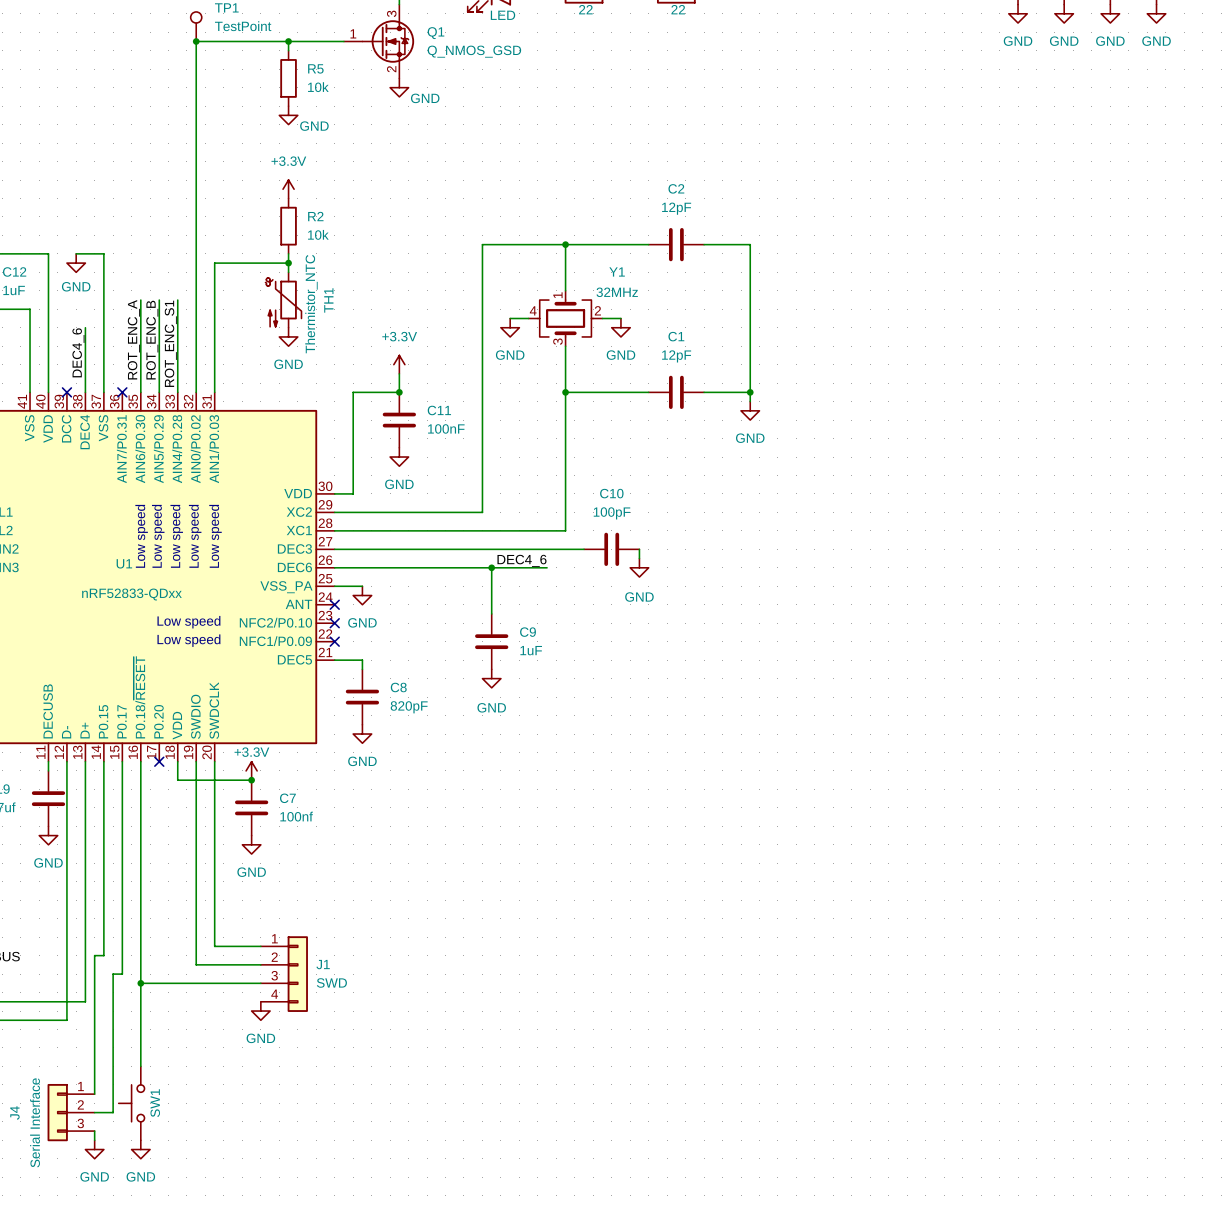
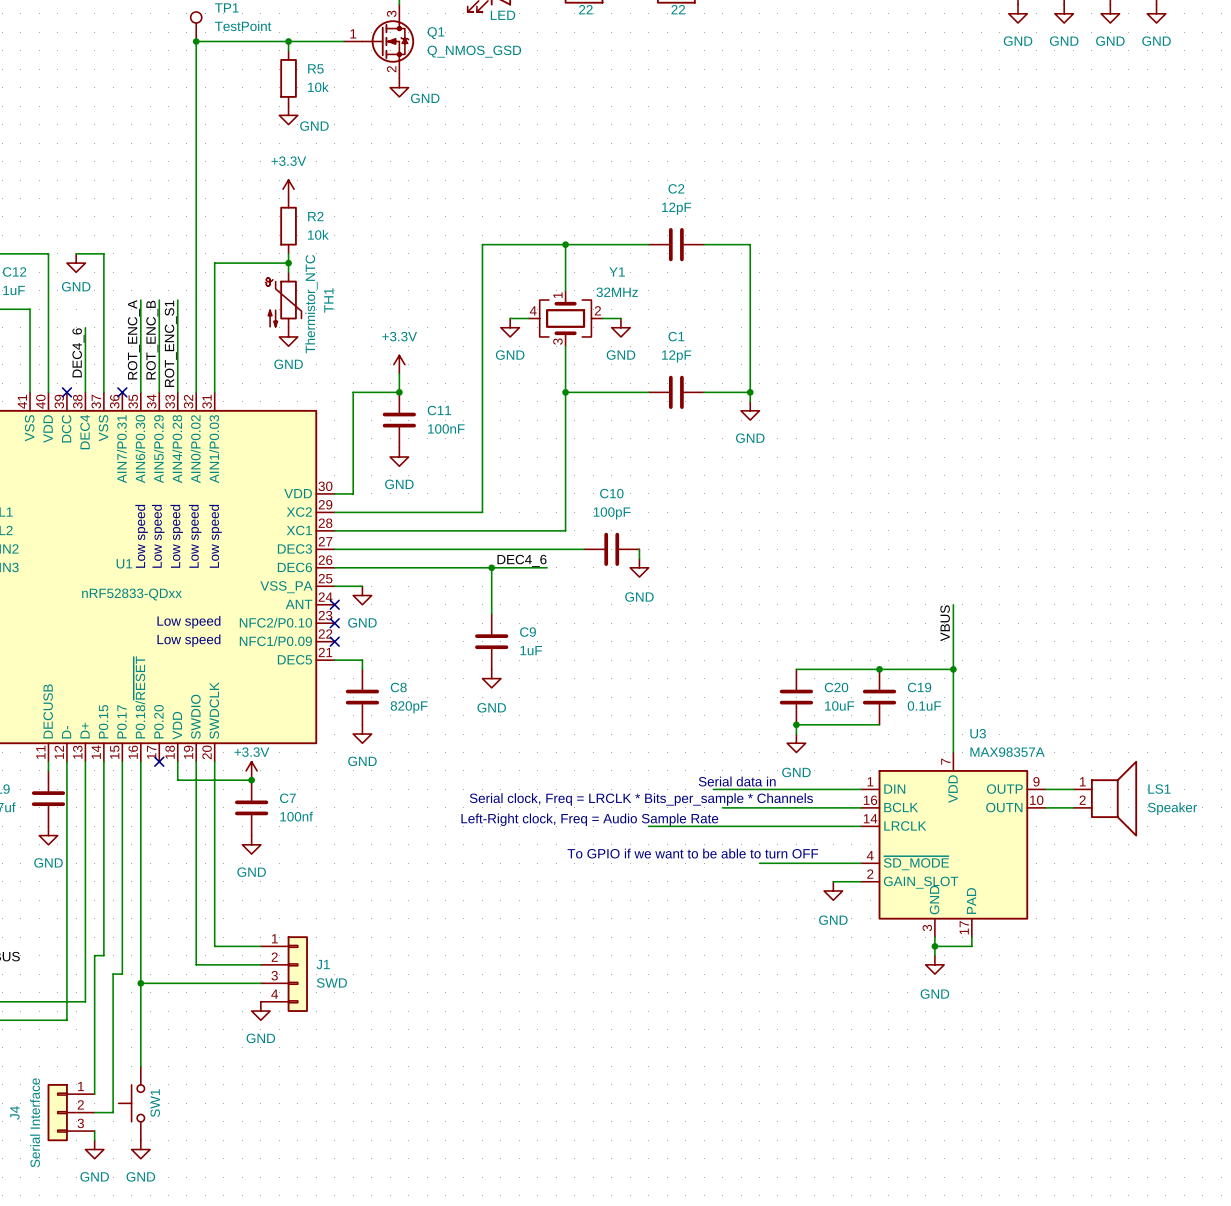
wire: none -> (953, 604) (953, 752)
label: none -> VBUS (945, 623)
wire: none -> (796, 669) (953, 669)
junction: none -> (879, 669)
junction: none -> (953, 669)
C20: none -> 10uF (796, 697)
C19: none -> 0.1uF (879, 697)
junction: none -> (796, 724)
wire: none -> (879, 724) (796, 724) (796, 734)
power symbol: none -> GND (796, 743)
text: none -> Serial data in (737, 781)
wire: none -> (713, 789) (861, 789)
wire: none -> (1045, 789) (1073, 789)
LS1: none -> Speaker (1105, 798)
text: none -> Serial clock, Freq = LRCLK * Bits_per_sample * Channels (641, 799)
wire: none -> (722, 807) (861, 807)
wire: none -> (1045, 807) (1073, 807)
text: none -> Left-Right clock, Freq = Audio Sample Rate (589, 819)
wire: none -> (648, 826) (861, 826)
U3: none -> MAX98357A (953, 844)
text: none -> To GPIO if we want to be able to turn OFF (692, 853)
wire: none -> (759, 863) (861, 863)
wire: none -> (833, 881) (861, 881)
power symbol: none -> GND (833, 890)
wire: none -> (934, 937) (934, 955)
wire: none -> (971, 937) (971, 946) (934, 946)
junction: none -> (934, 946)
power symbol: none -> GND (934, 964)

